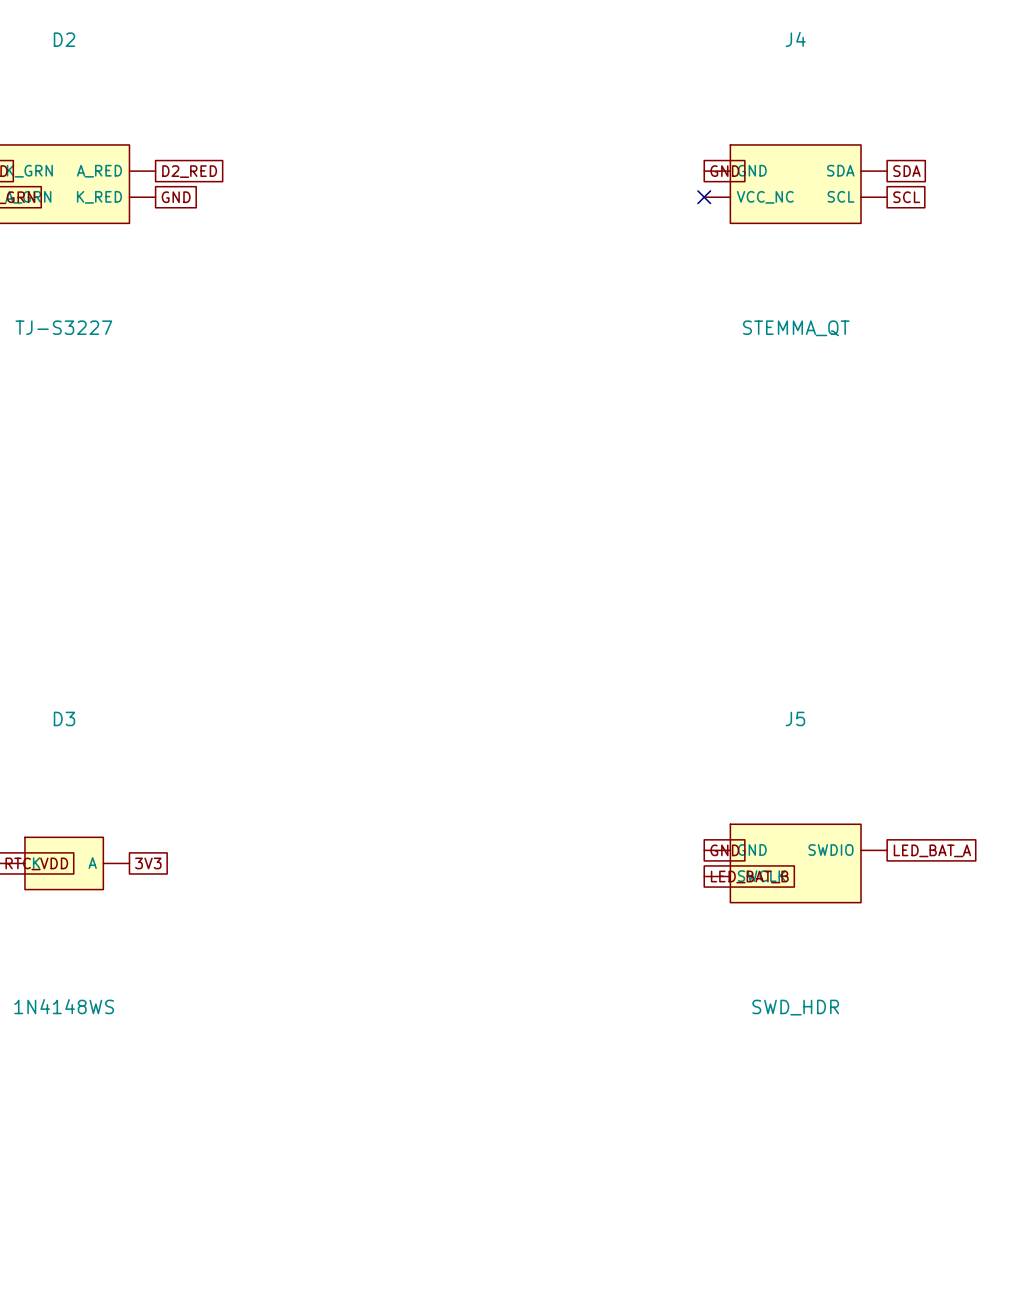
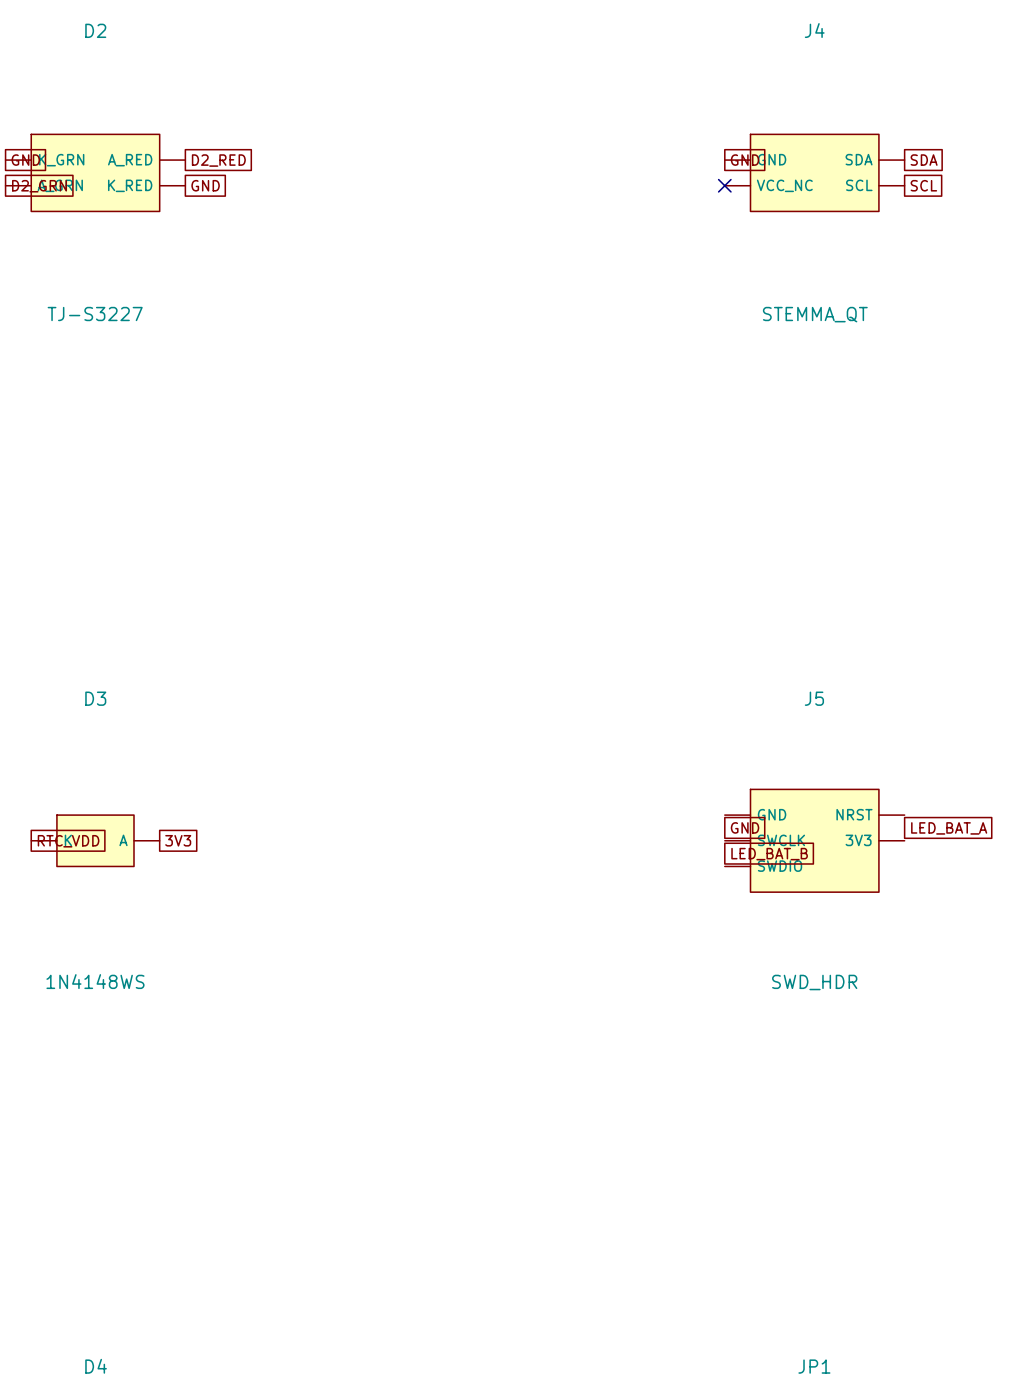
J5 symbol: [704, 823, 888, 904] -> [724, 788, 905, 893]

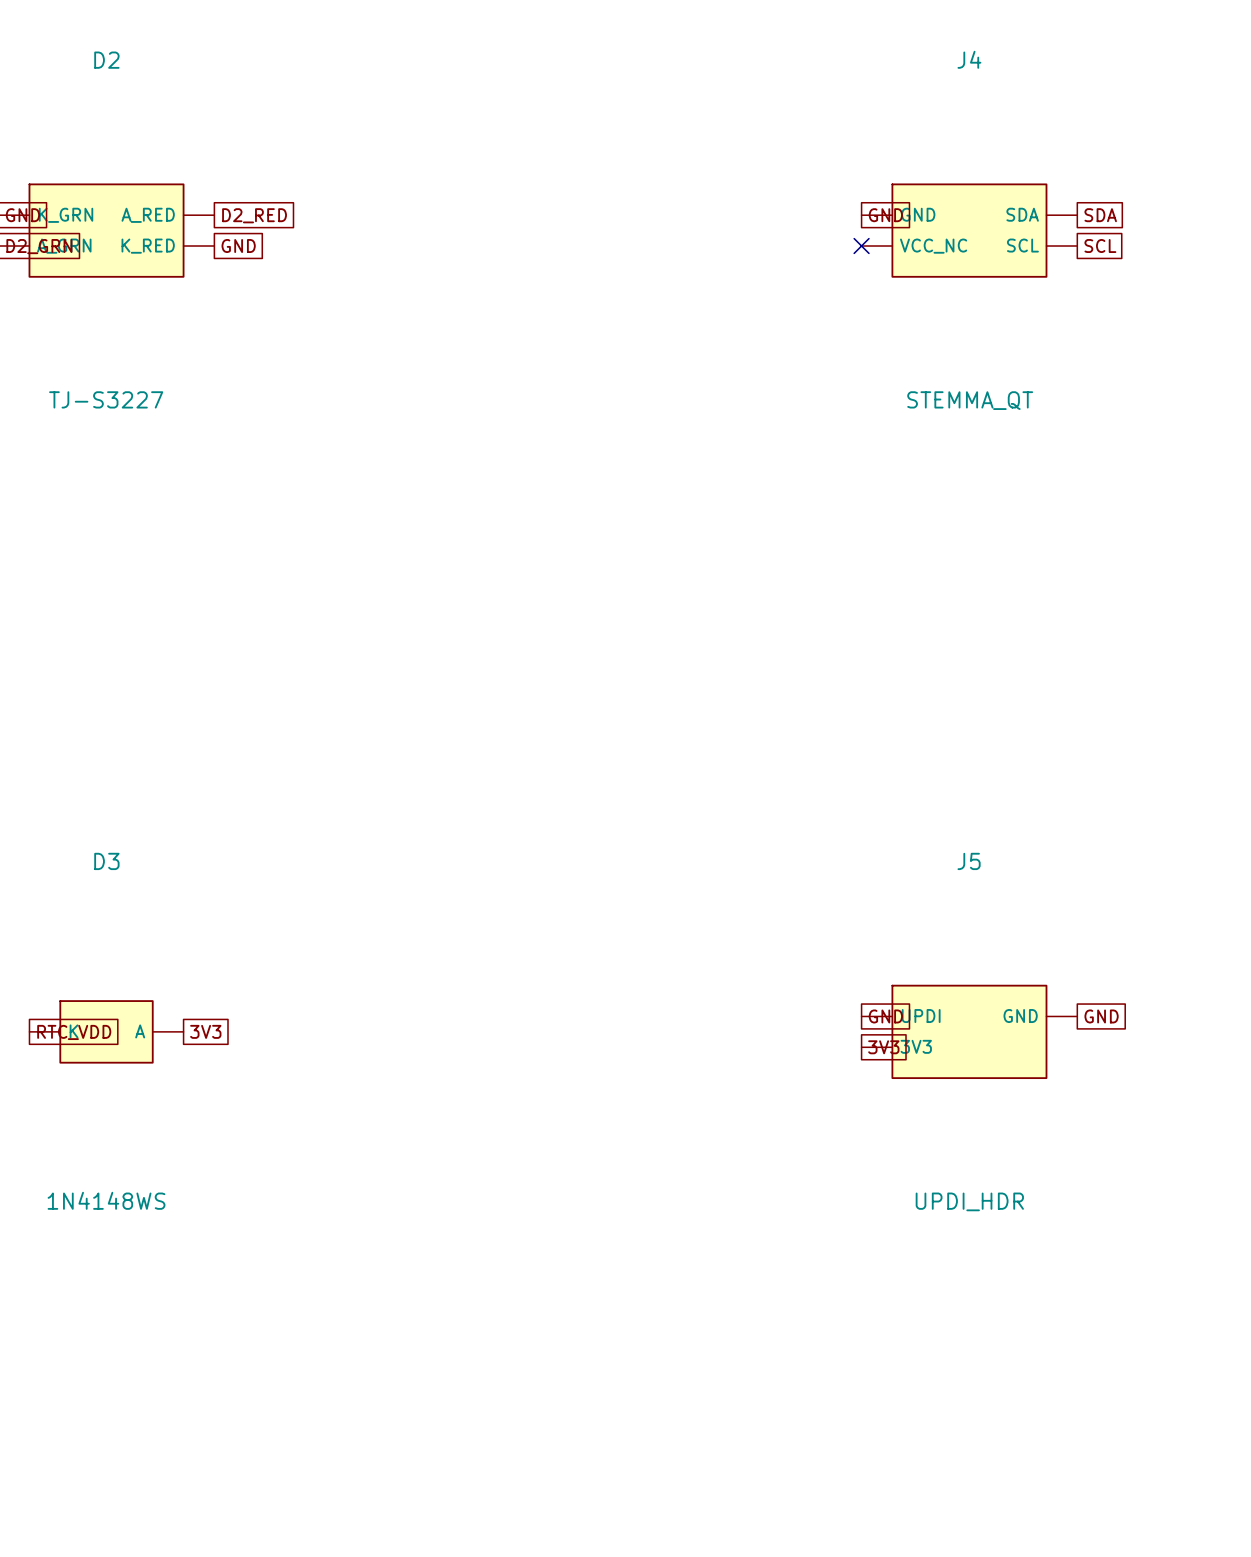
J5 symbol: [724, 788, 905, 893] -> [861, 984, 1078, 1080]
global label: LED_BAT_A (949, 828) -> GND (1101, 1016)
global label: LED_BAT_B (769, 854) -> 3V3 (883, 1047)
J5 value: SWD_HDR (814, 982) -> UPDI_HDR (969, 1201)

